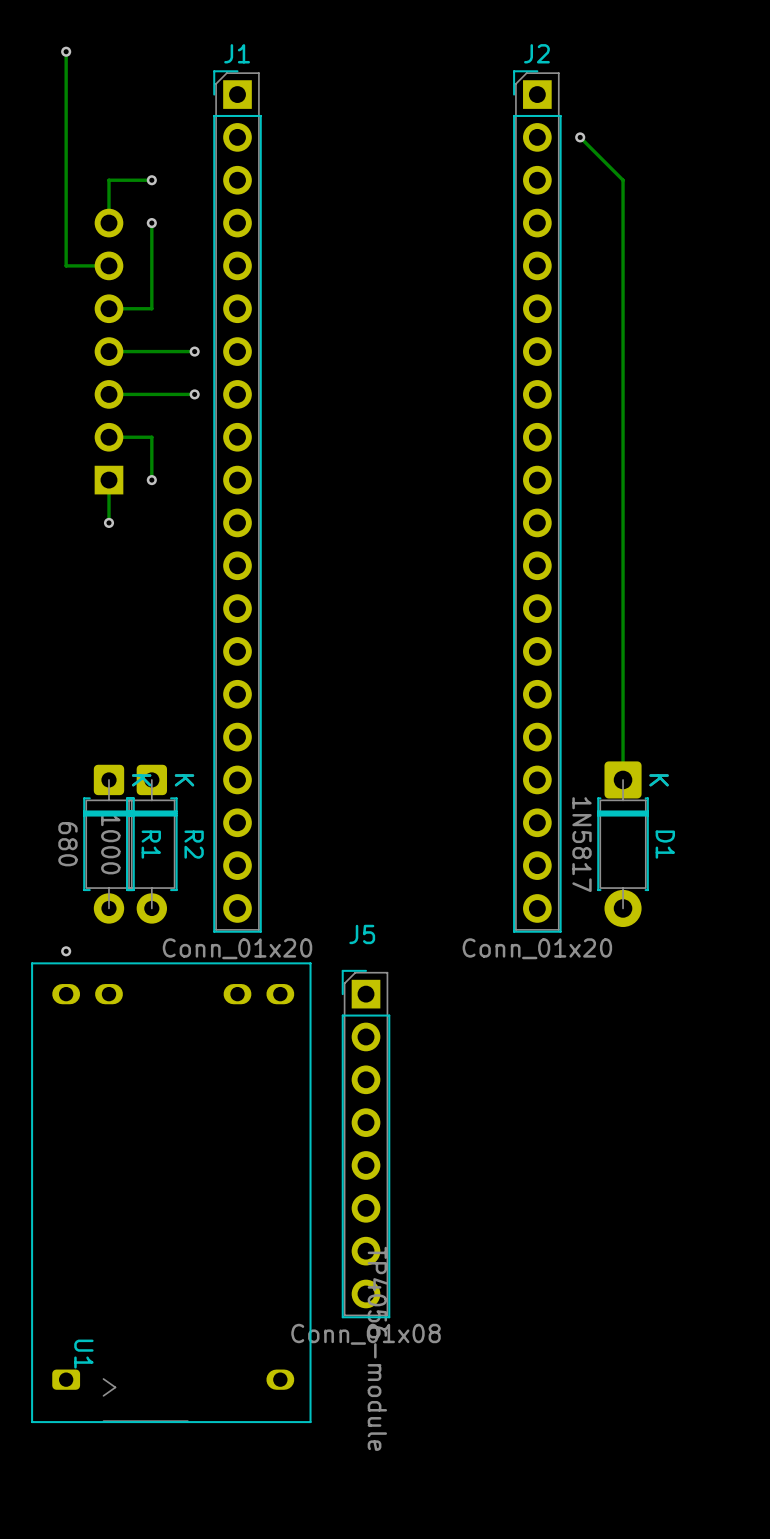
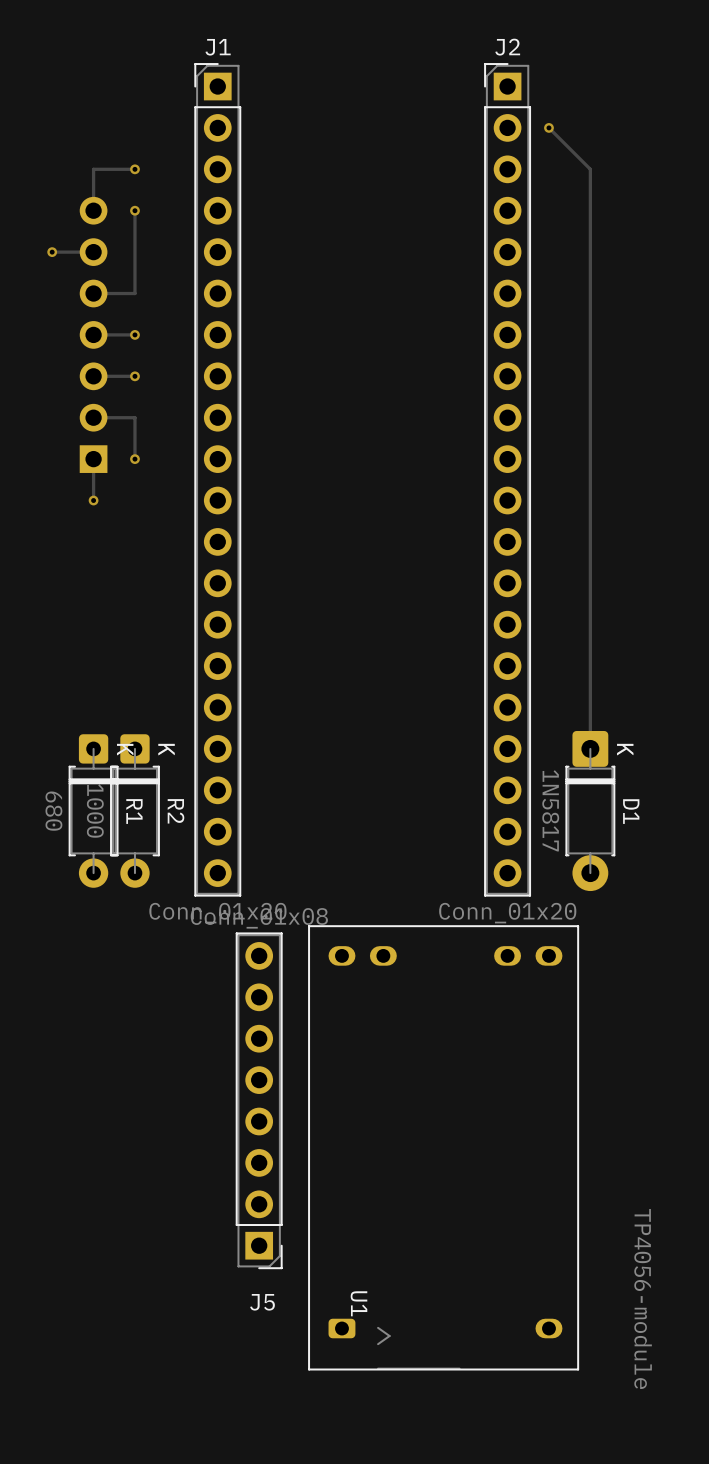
track: (66, 51) (66, 265) -> none
via: (66, 51) -> none
via: none -> (52, 252)
via: none -> (134, 334)
track: (194, 351) (151, 351) -> none
via: (194, 351) -> none
via: none -> (134, 376)
track: (194, 394) (151, 394) -> none
via: (194, 394) -> none
via: (66, 951) -> none
J5 rotation: 0° (366, 1144) -> 180° (259, 1100)
U1 position: (171, 1192) -> (443, 1147)

